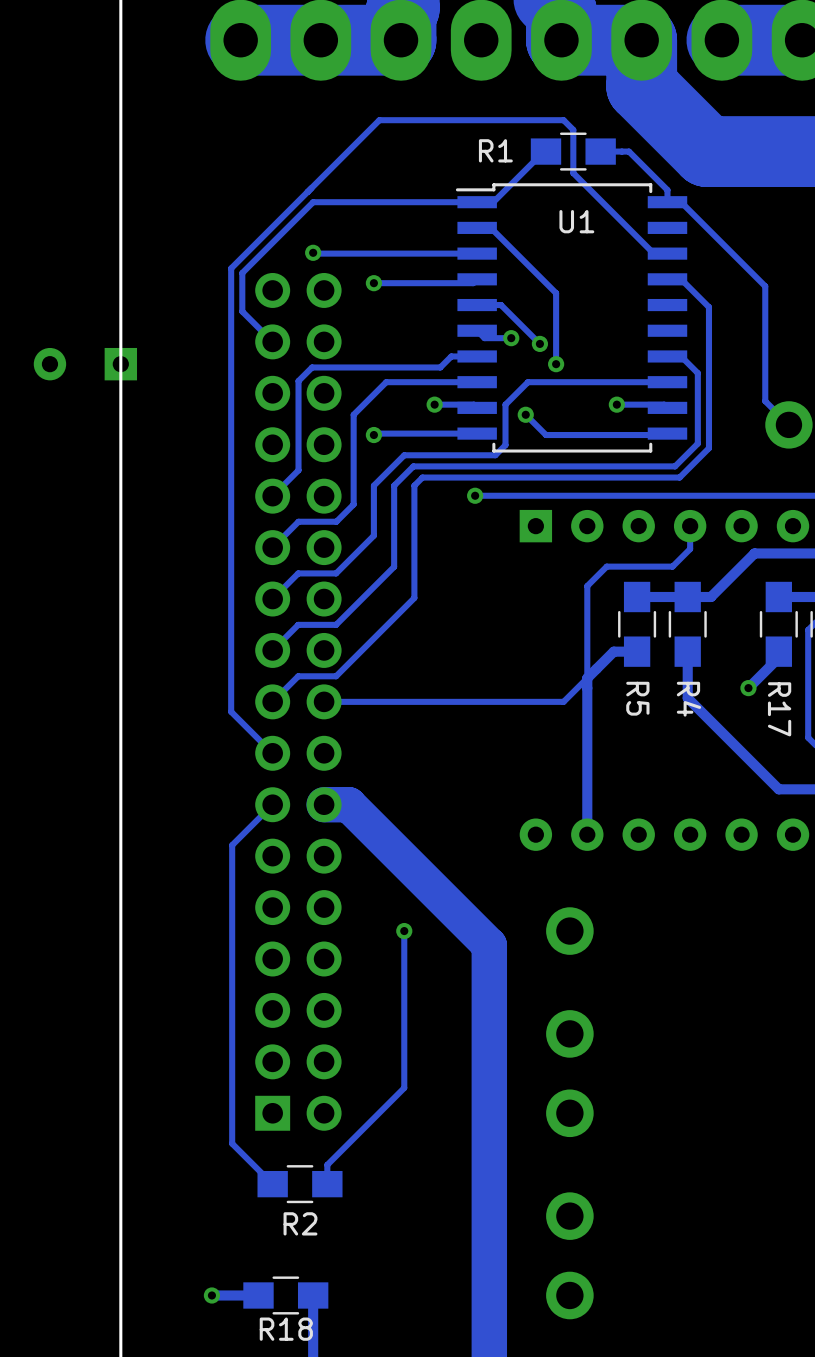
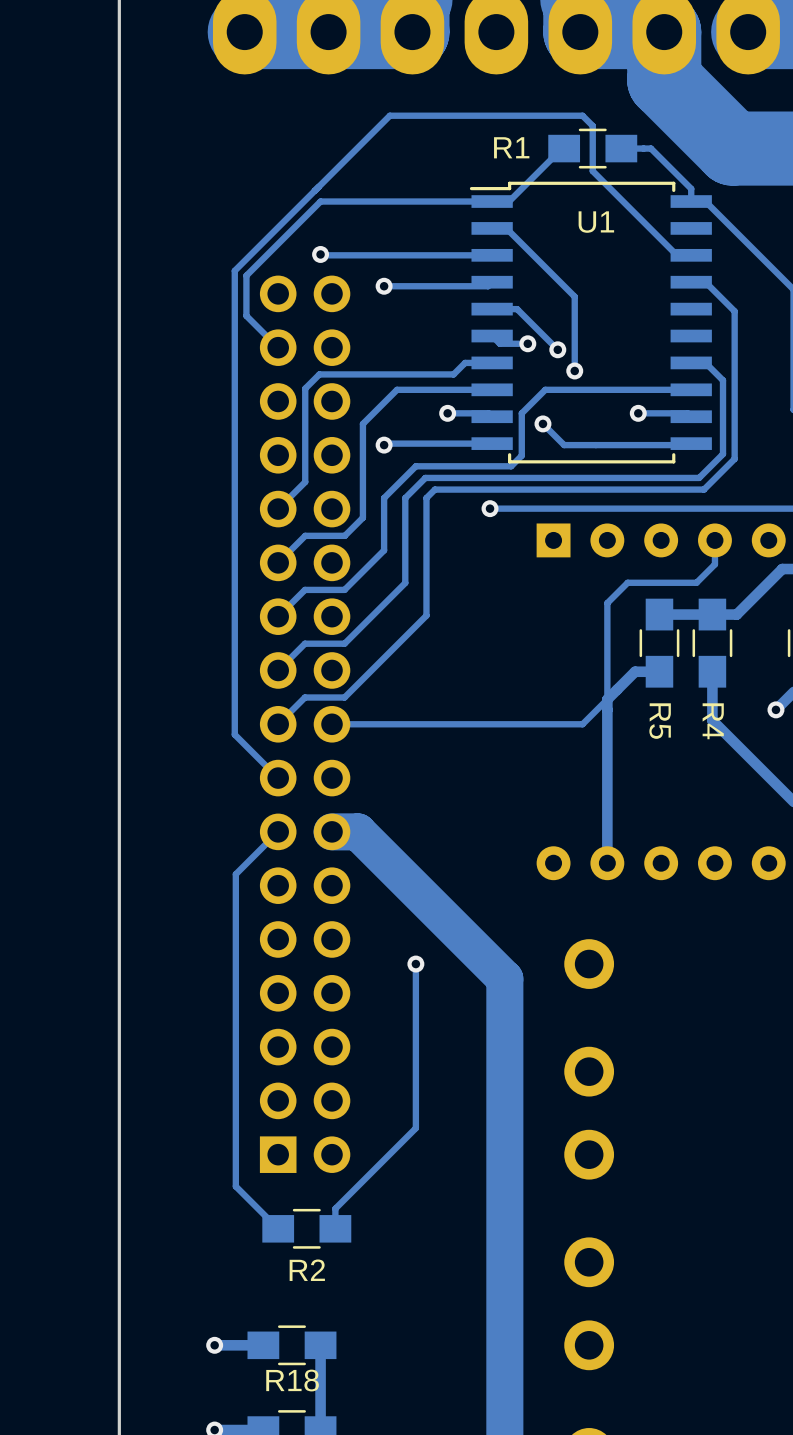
part: (85, 364) -> none

